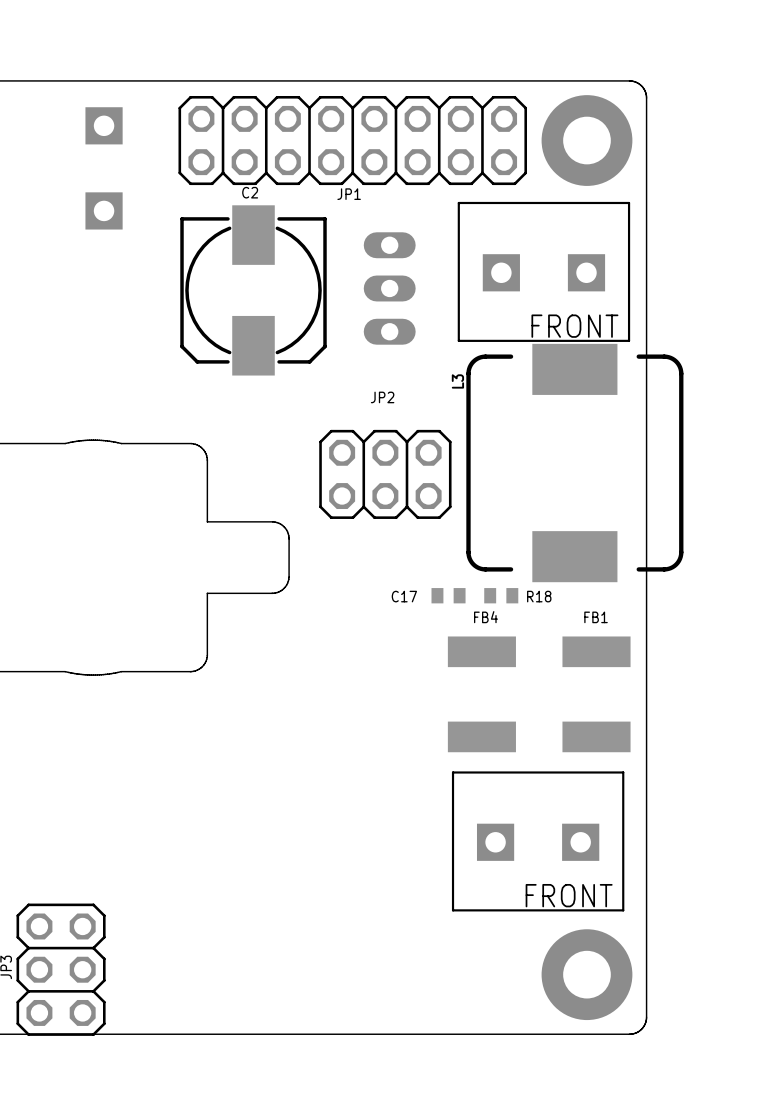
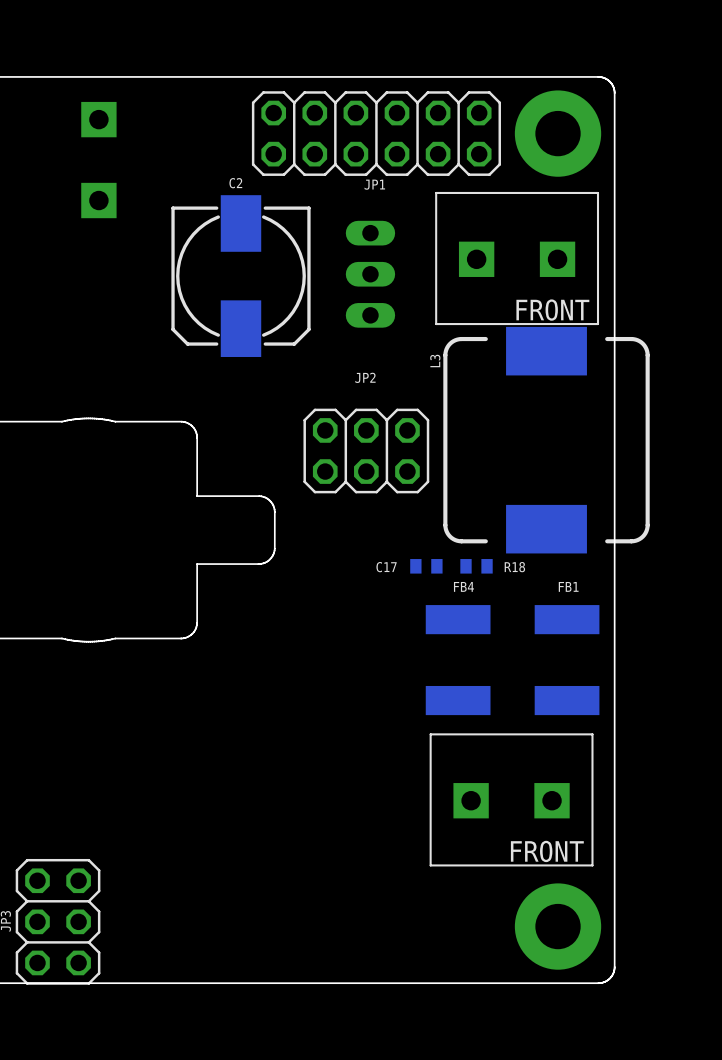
JP1 footprint: [178, 95, 528, 186] -> [251, 91, 501, 176]

